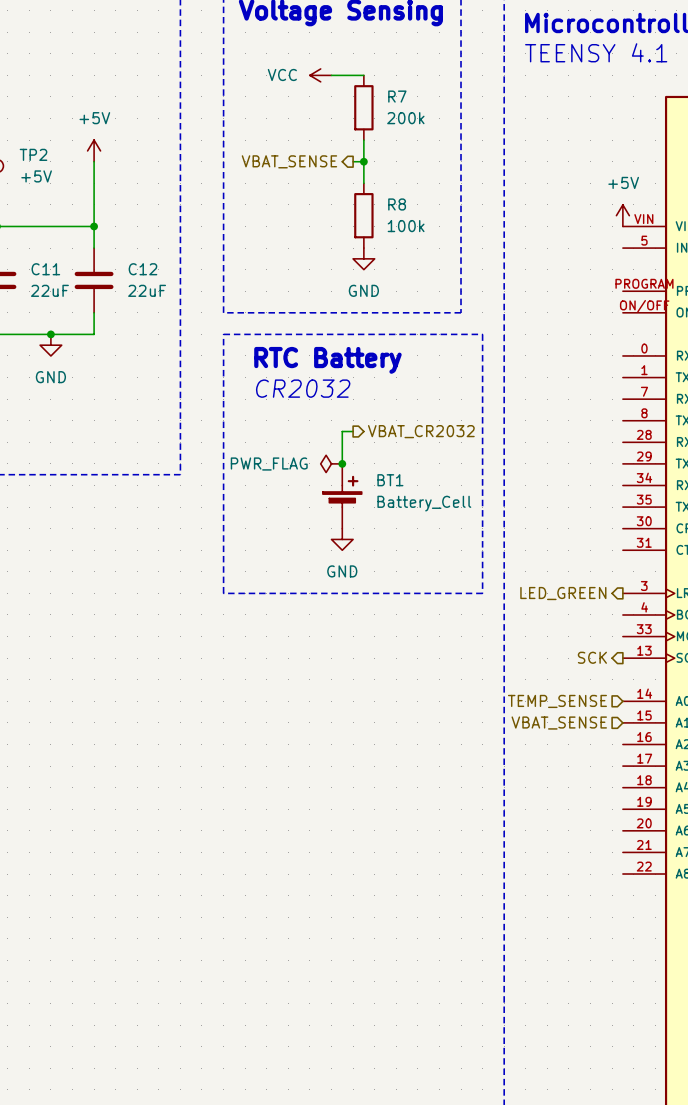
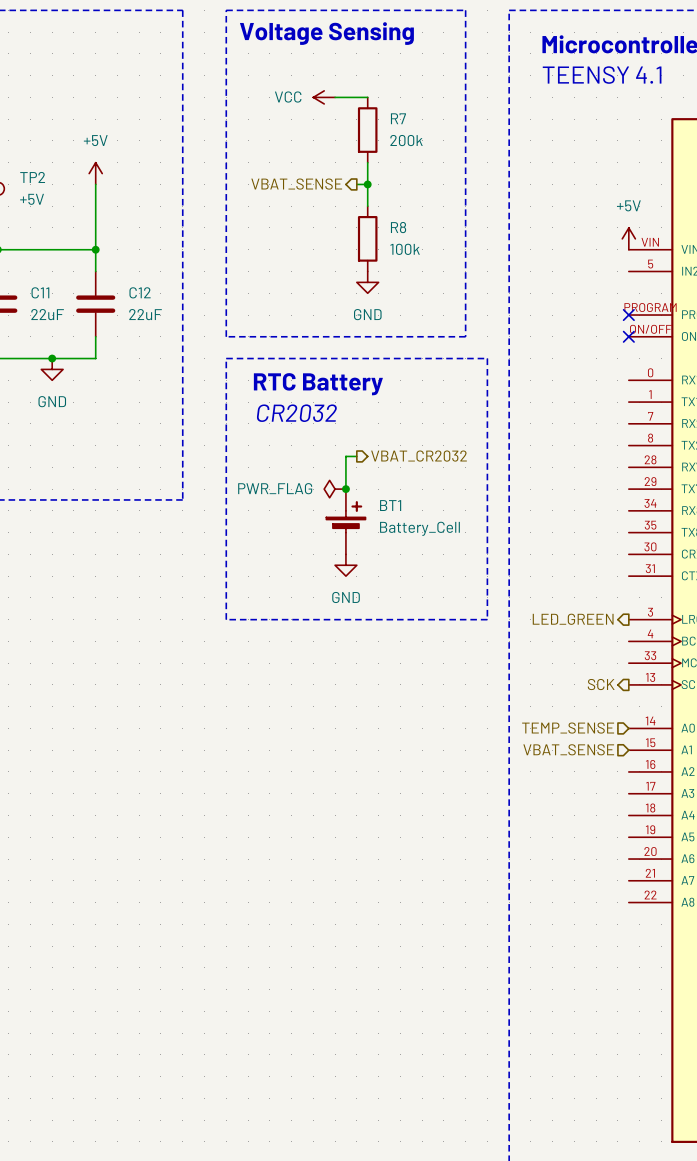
no-connect mark: none -> (628, 315)
no-connect mark: none -> (628, 336)

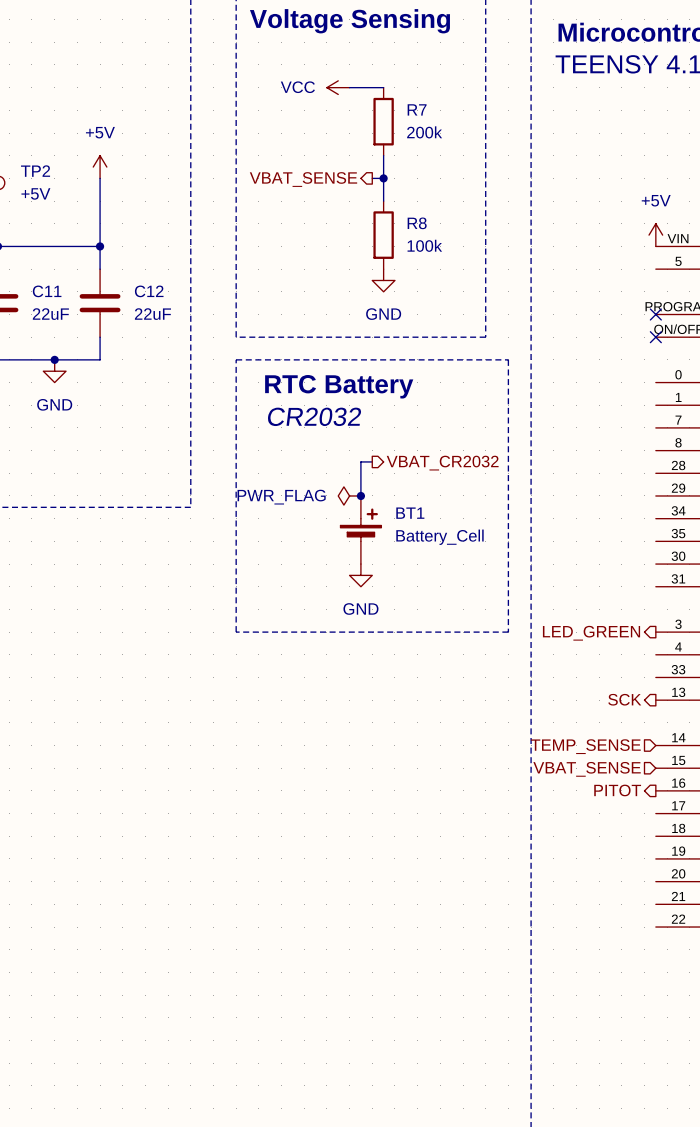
hierarchical label: none -> PITOT (617, 790)

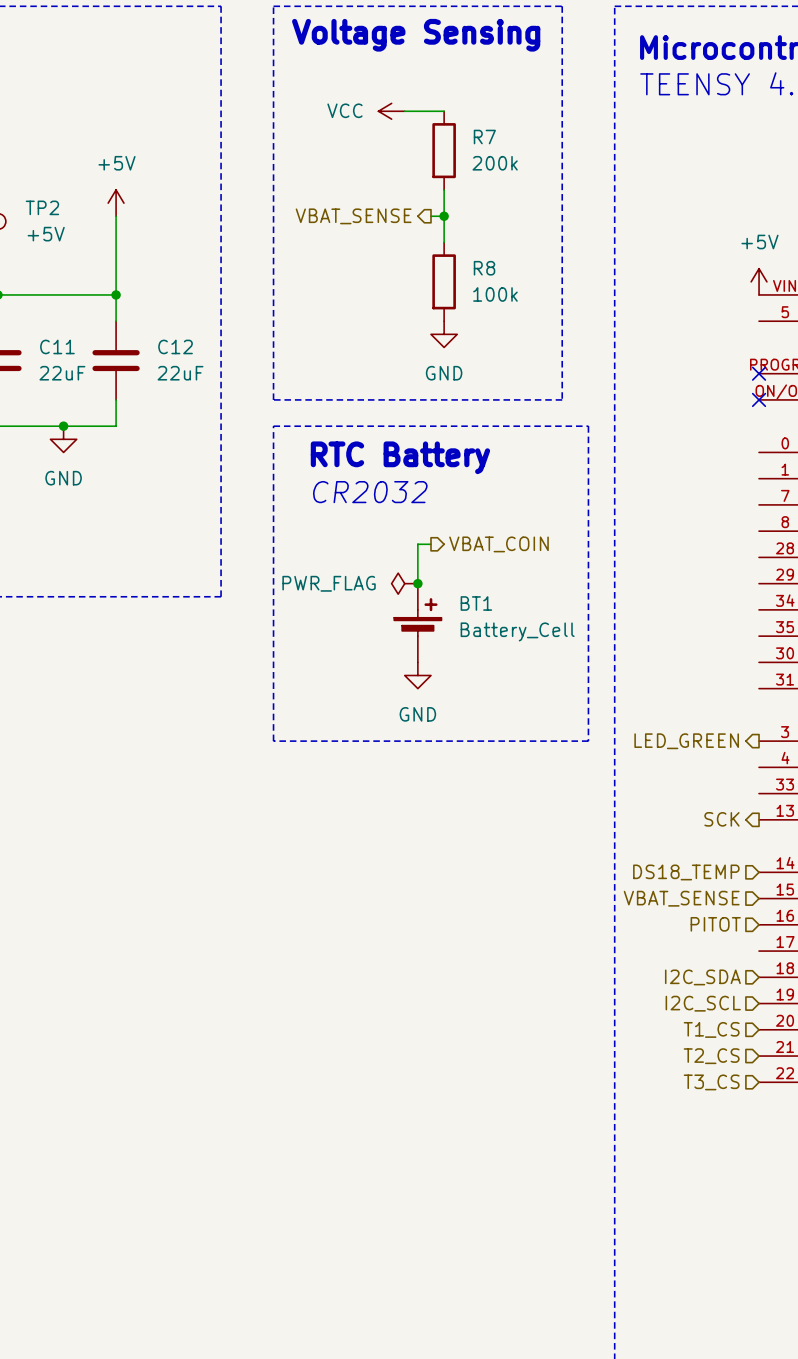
hierarchical label: VBAT_CR2032 (442, 463) -> VBAT_COIN (498, 544)
hierarchical label: TEMP_SENSE (585, 746) -> DS18_TEMP (686, 872)
hierarchical label shape: output (617, 790) -> input (715, 924)
hierarchical label: none -> I2C_SDA (702, 977)
hierarchical label: none -> I2C_SCL (703, 1003)
hierarchical label: none -> T1_CS (711, 1029)
hierarchical label: none -> T2_CS (711, 1056)
hierarchical label: none -> T3_CS (711, 1082)

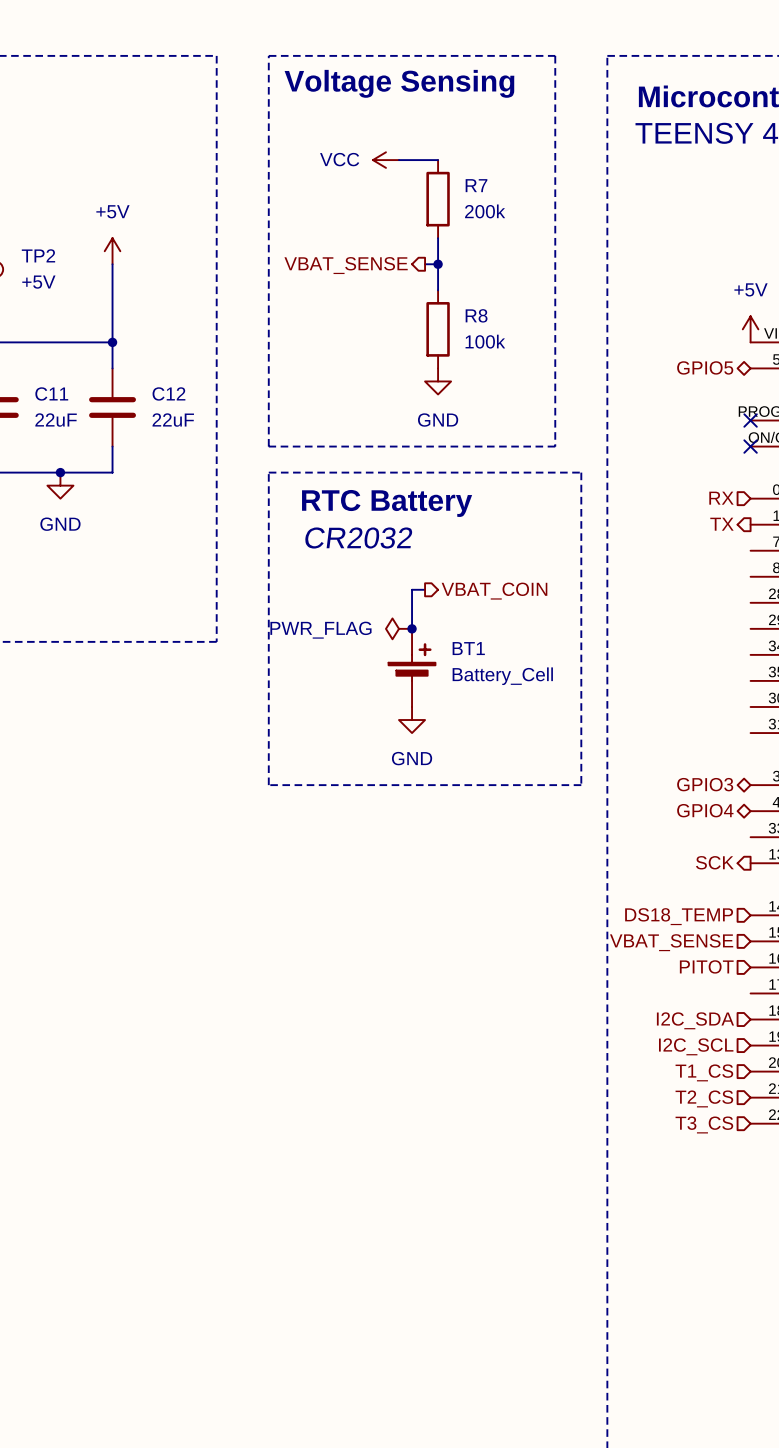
hierarchical label: none -> GPIO5 (705, 367)
hierarchical label: none -> RX (721, 498)
hierarchical label: none -> TX (721, 524)
hierarchical label shape: output (686, 741) -> bidirectional (705, 784)
hierarchical label: LED_GREEN (686, 741) -> GPIO3 (705, 784)
hierarchical label: none -> GPIO4 (705, 810)

